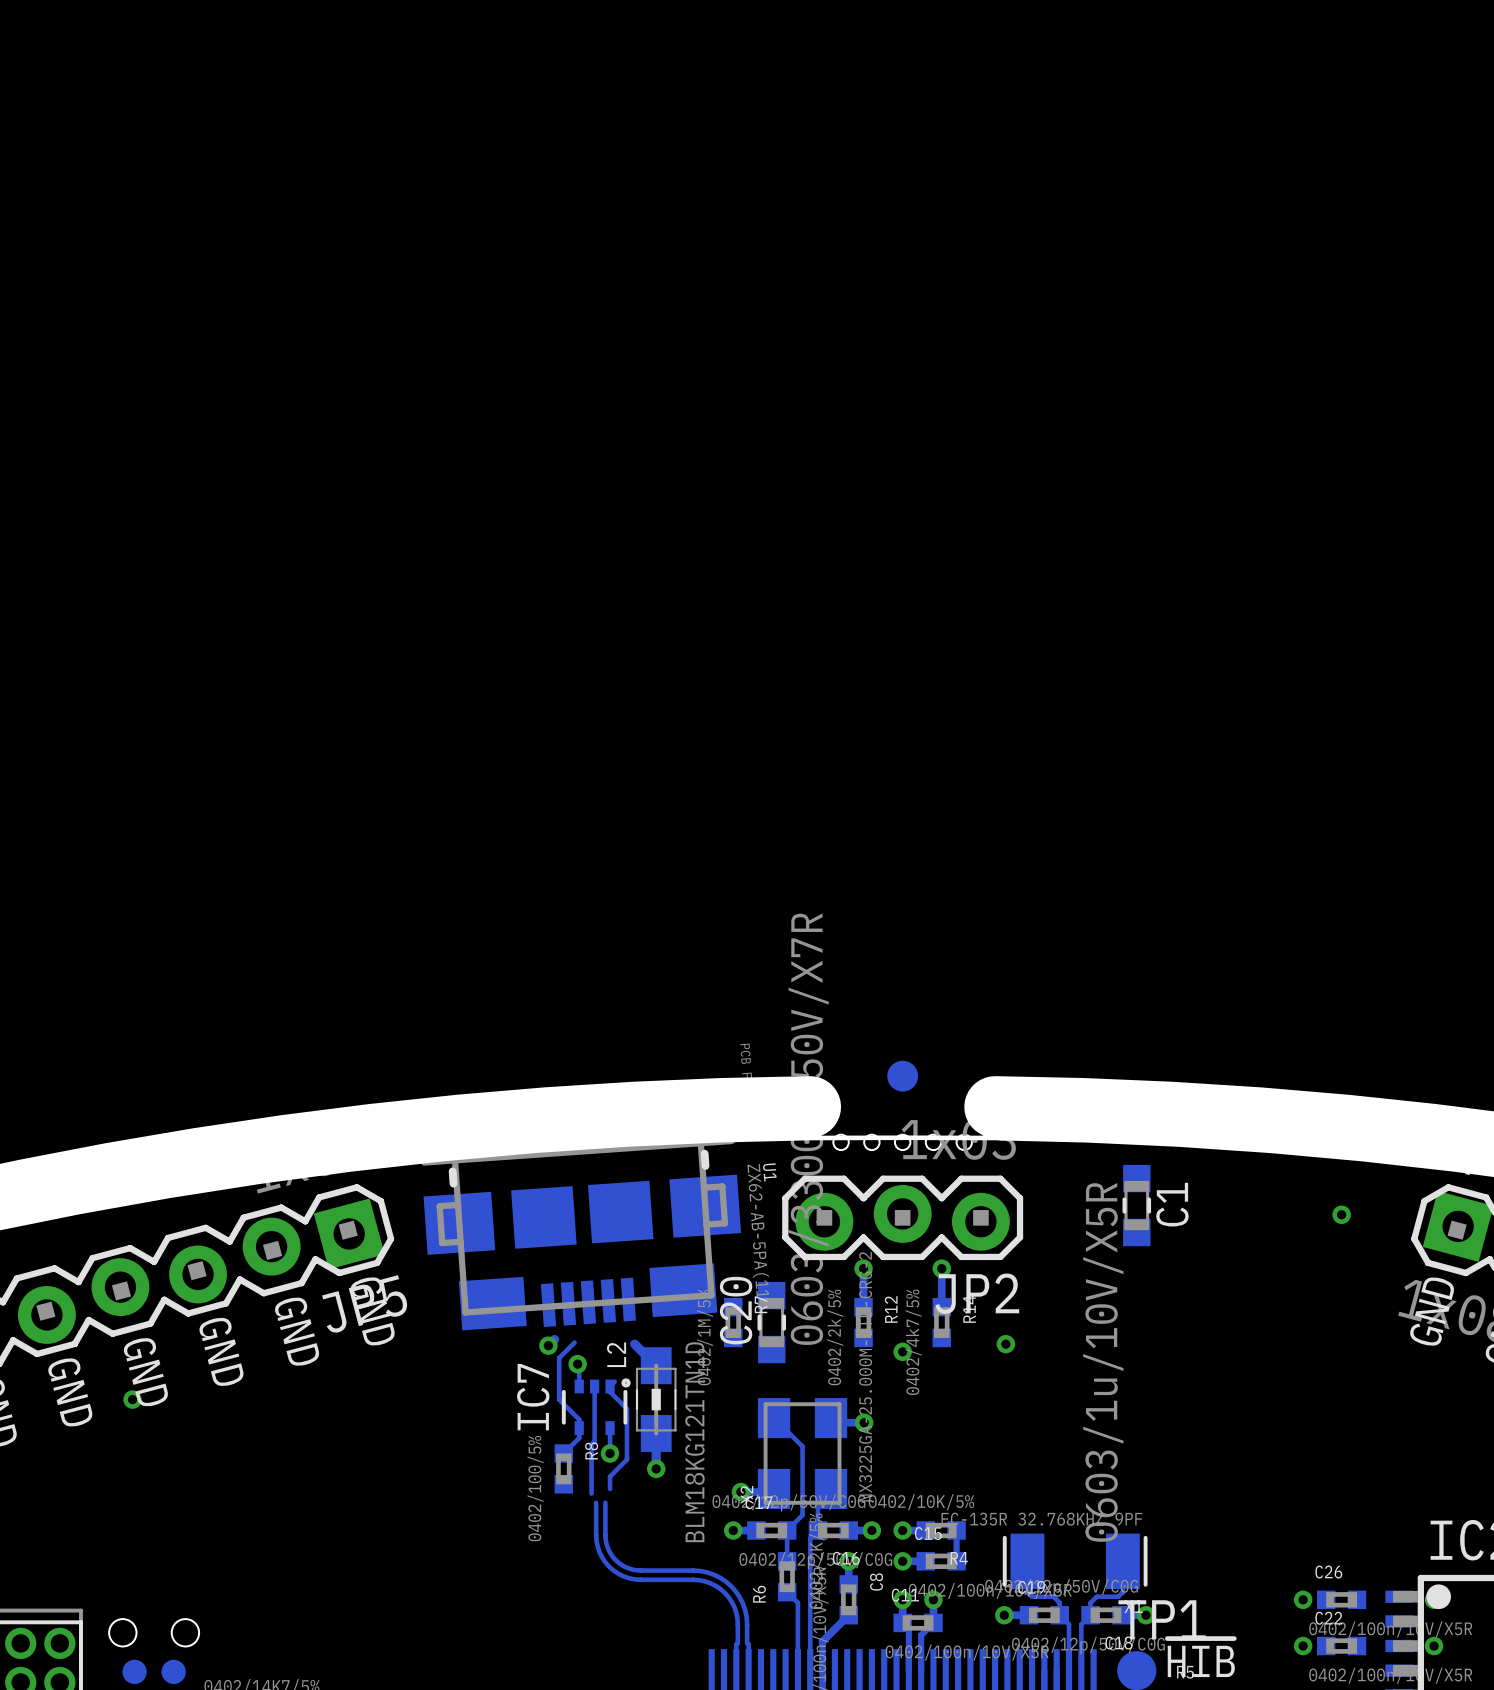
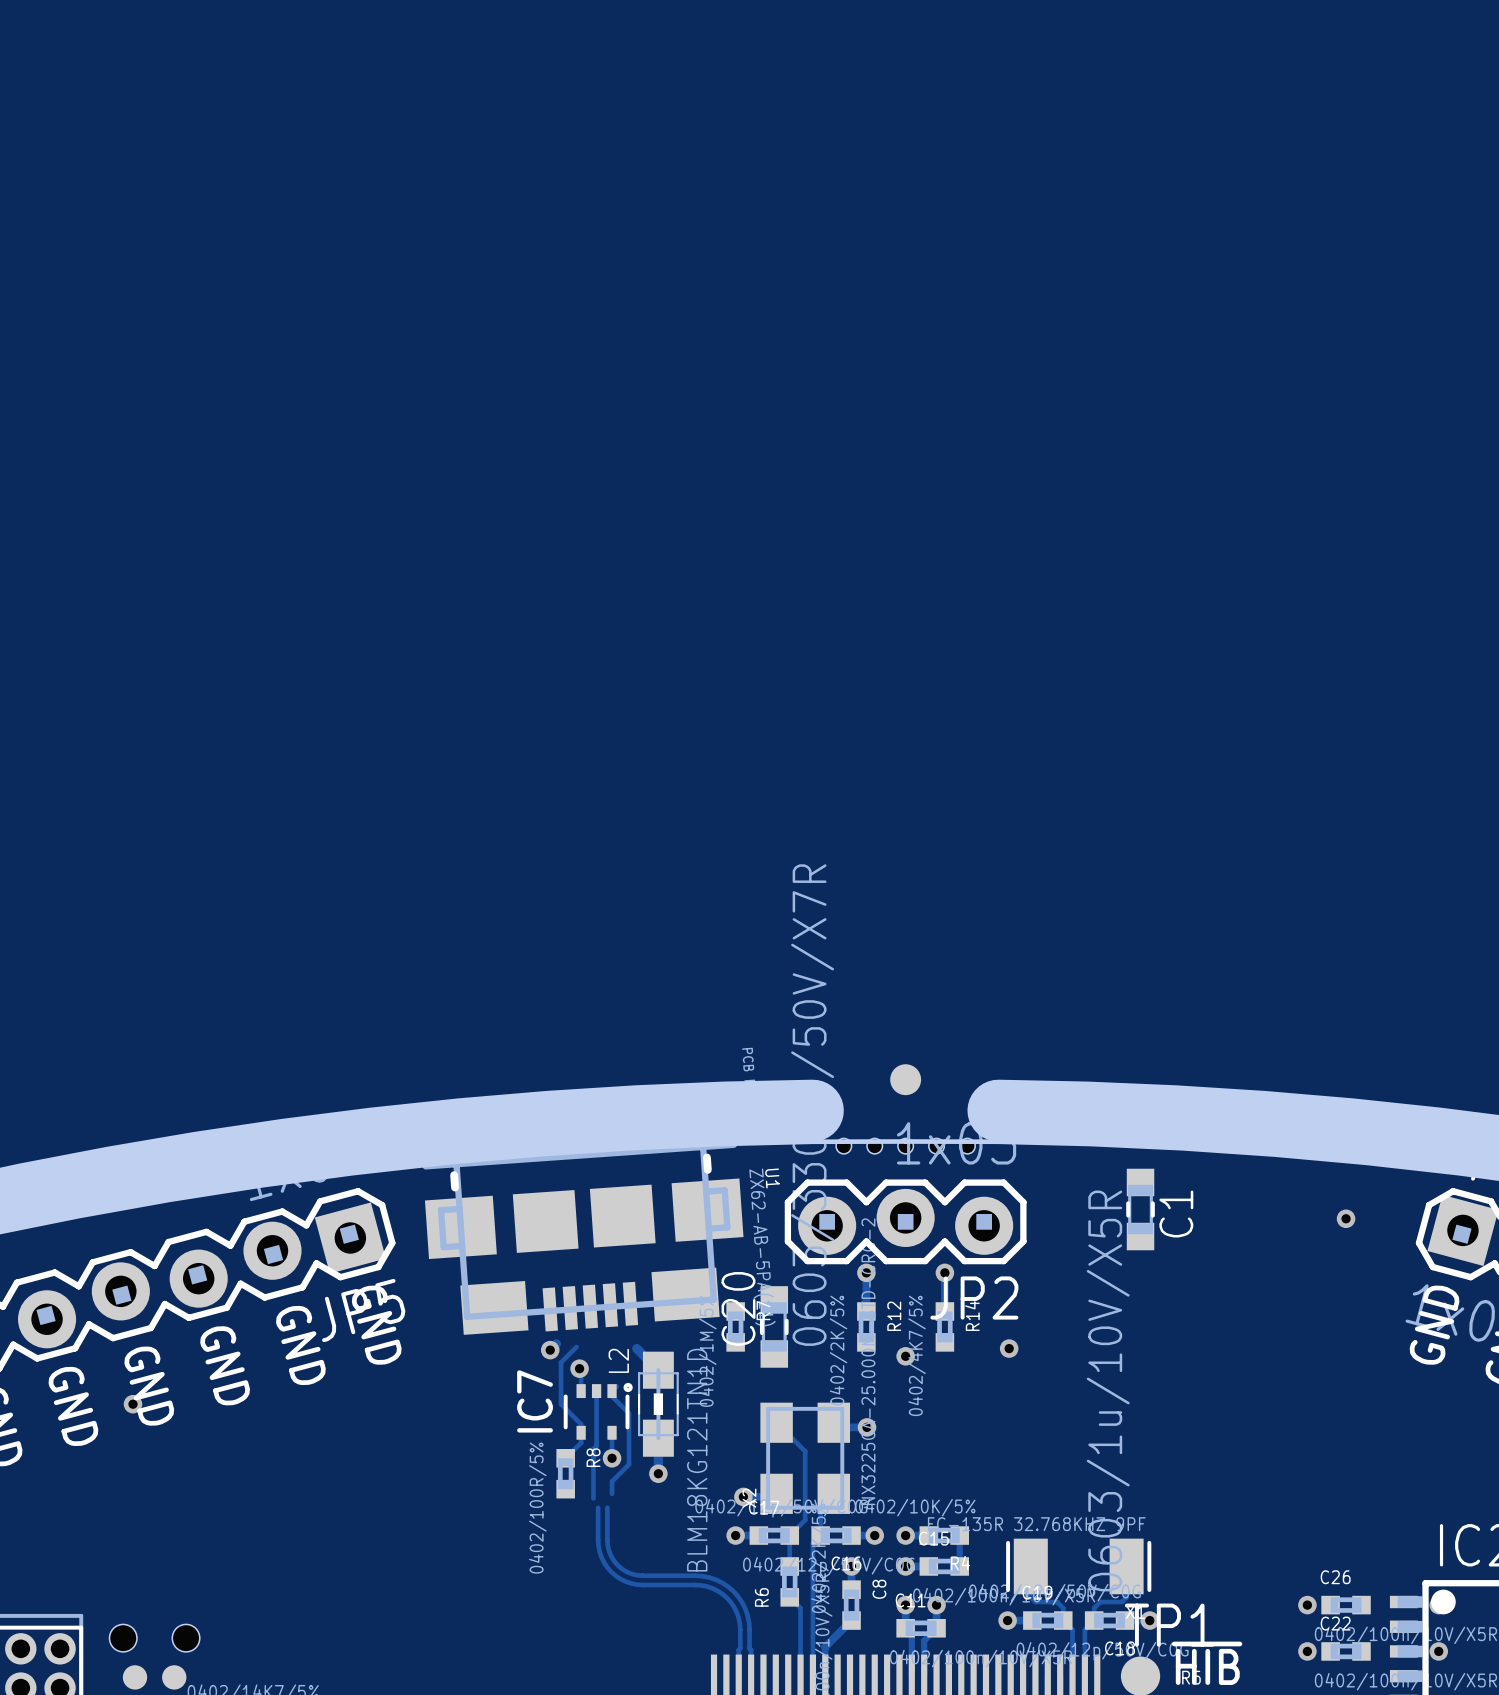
R12 value: 0402/2k/5% (835, 1337) -> 0402/2K/5% (838, 1350)
R14 value: 0402/4k7/5% (913, 1342) -> 0402/4K7/5% (917, 1355)
R8 value: 0402/100/5% (535, 1488) -> 0402/100R/5% (537, 1508)

